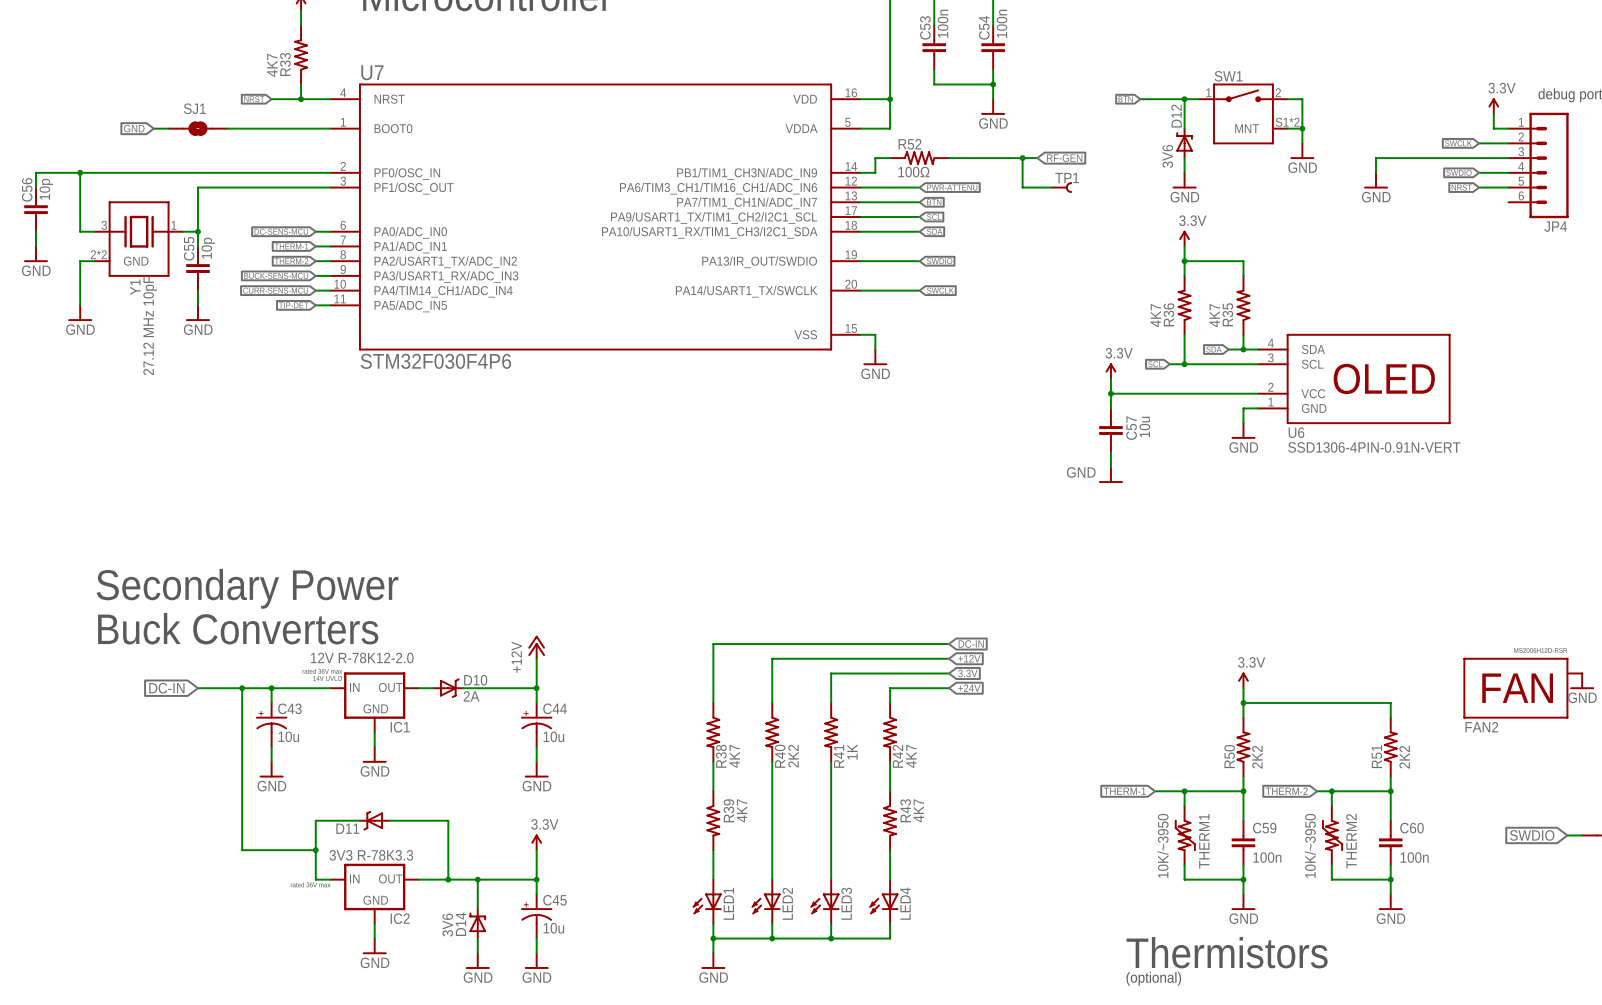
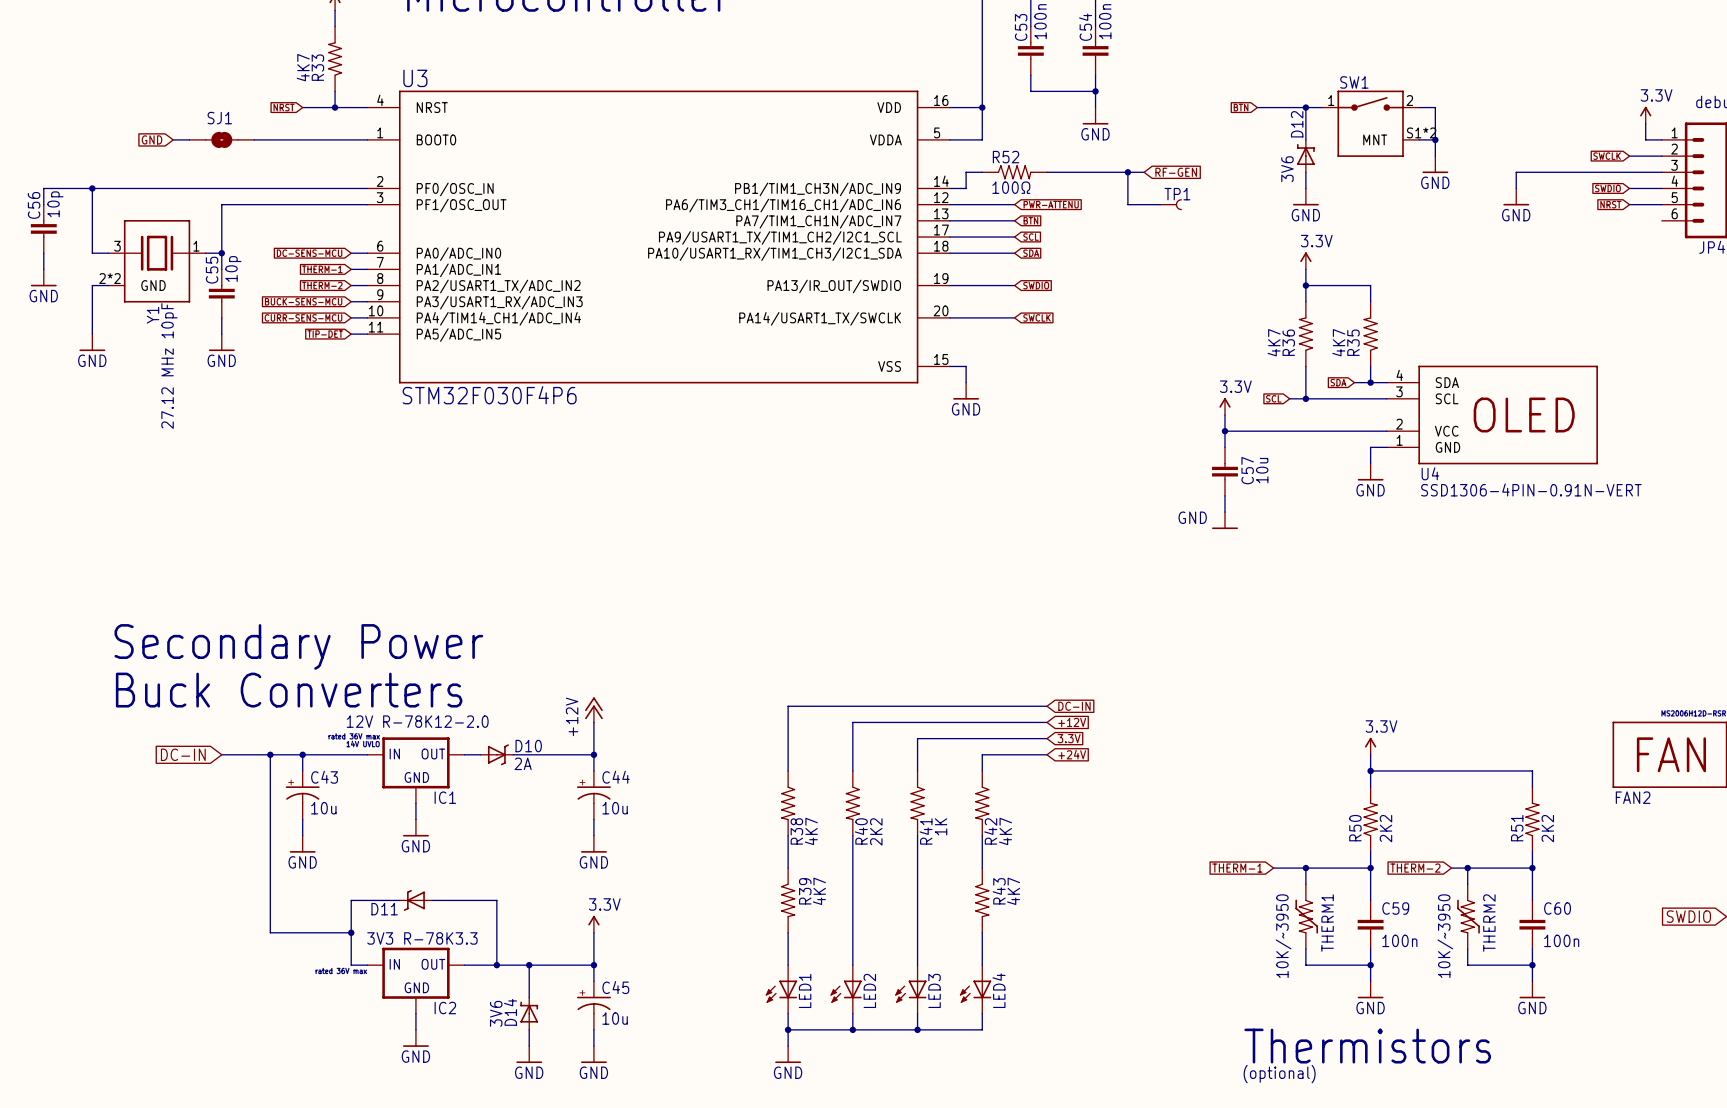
U7 name: U7 (372, 72) -> U3 (415, 78)
U6 name: U6 (1296, 432) -> U4 (1430, 473)

